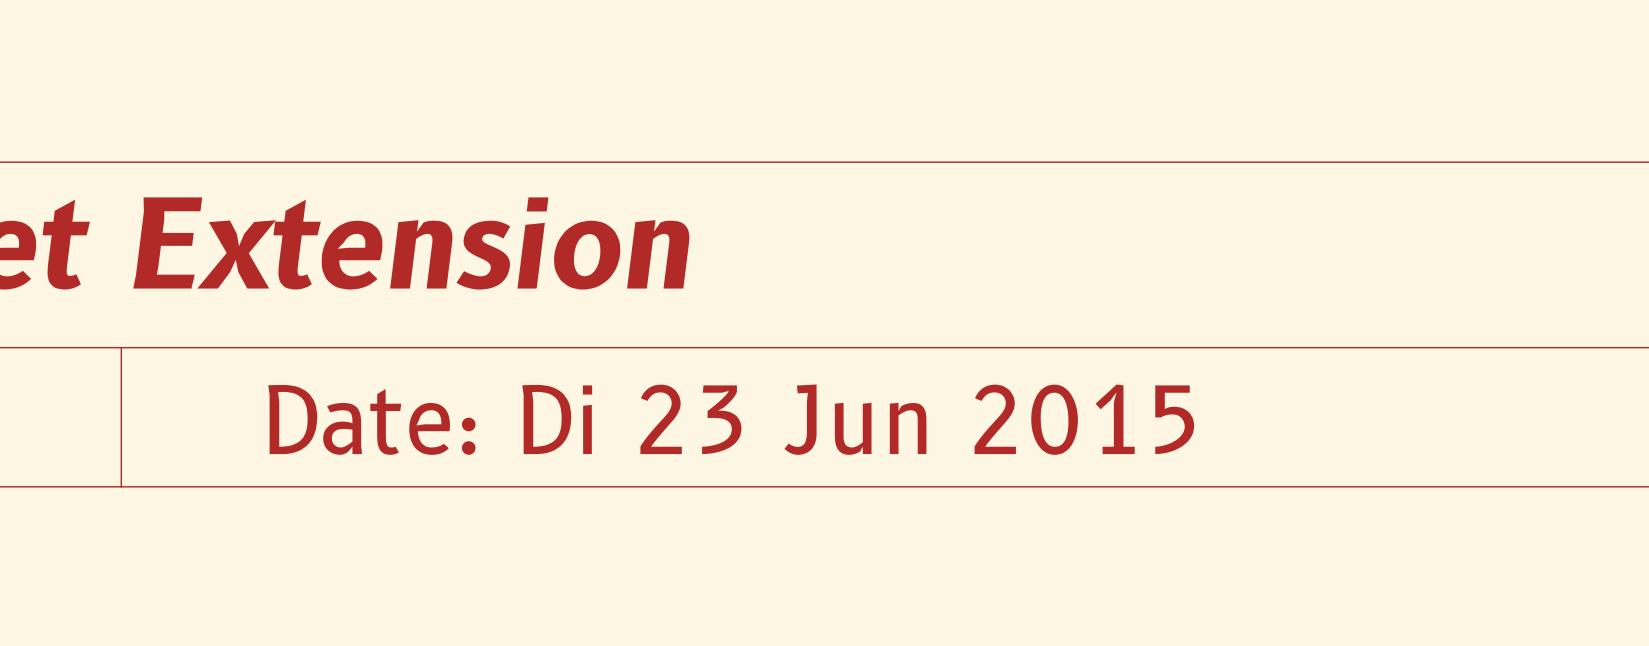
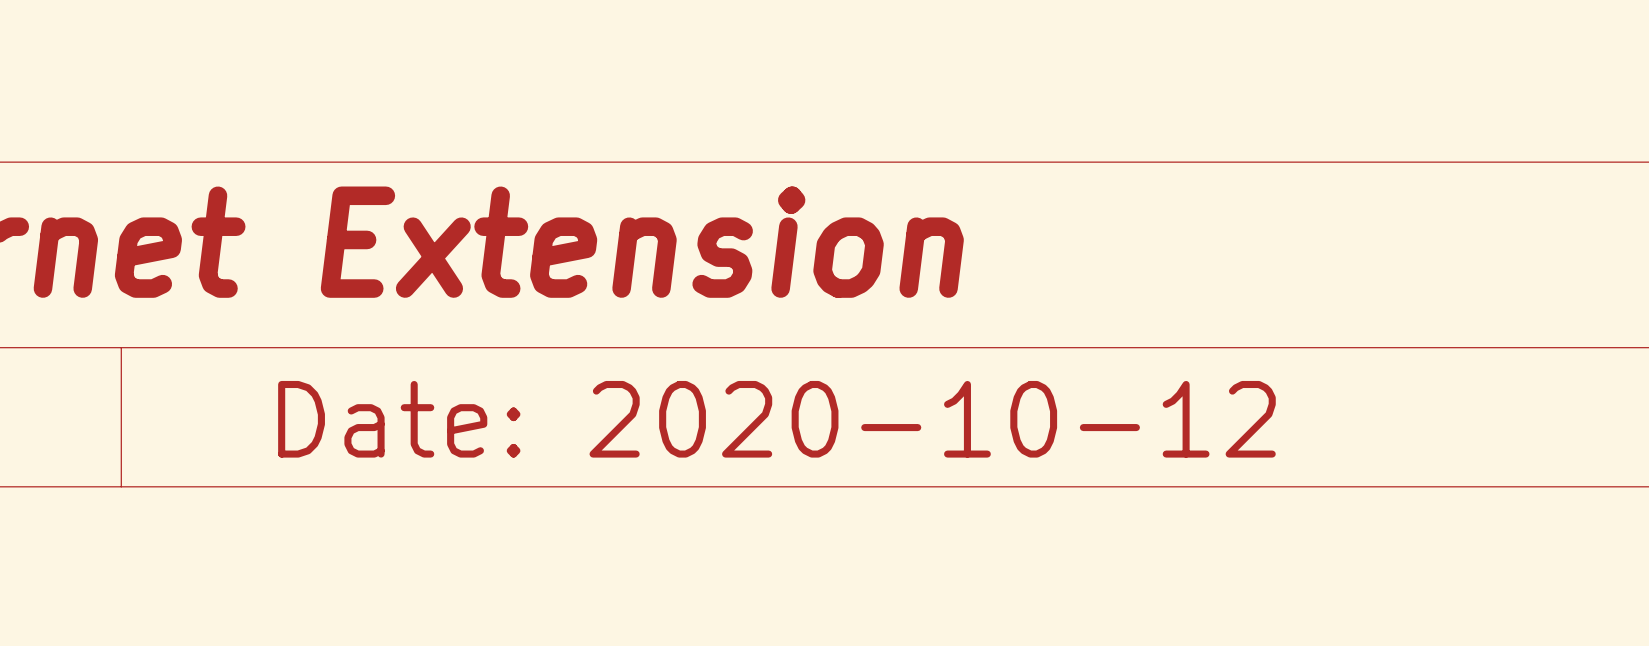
title block: Date: Di 23 Jun 2015 (731, 419) -> Date: 2020-10-12 (776, 419)

